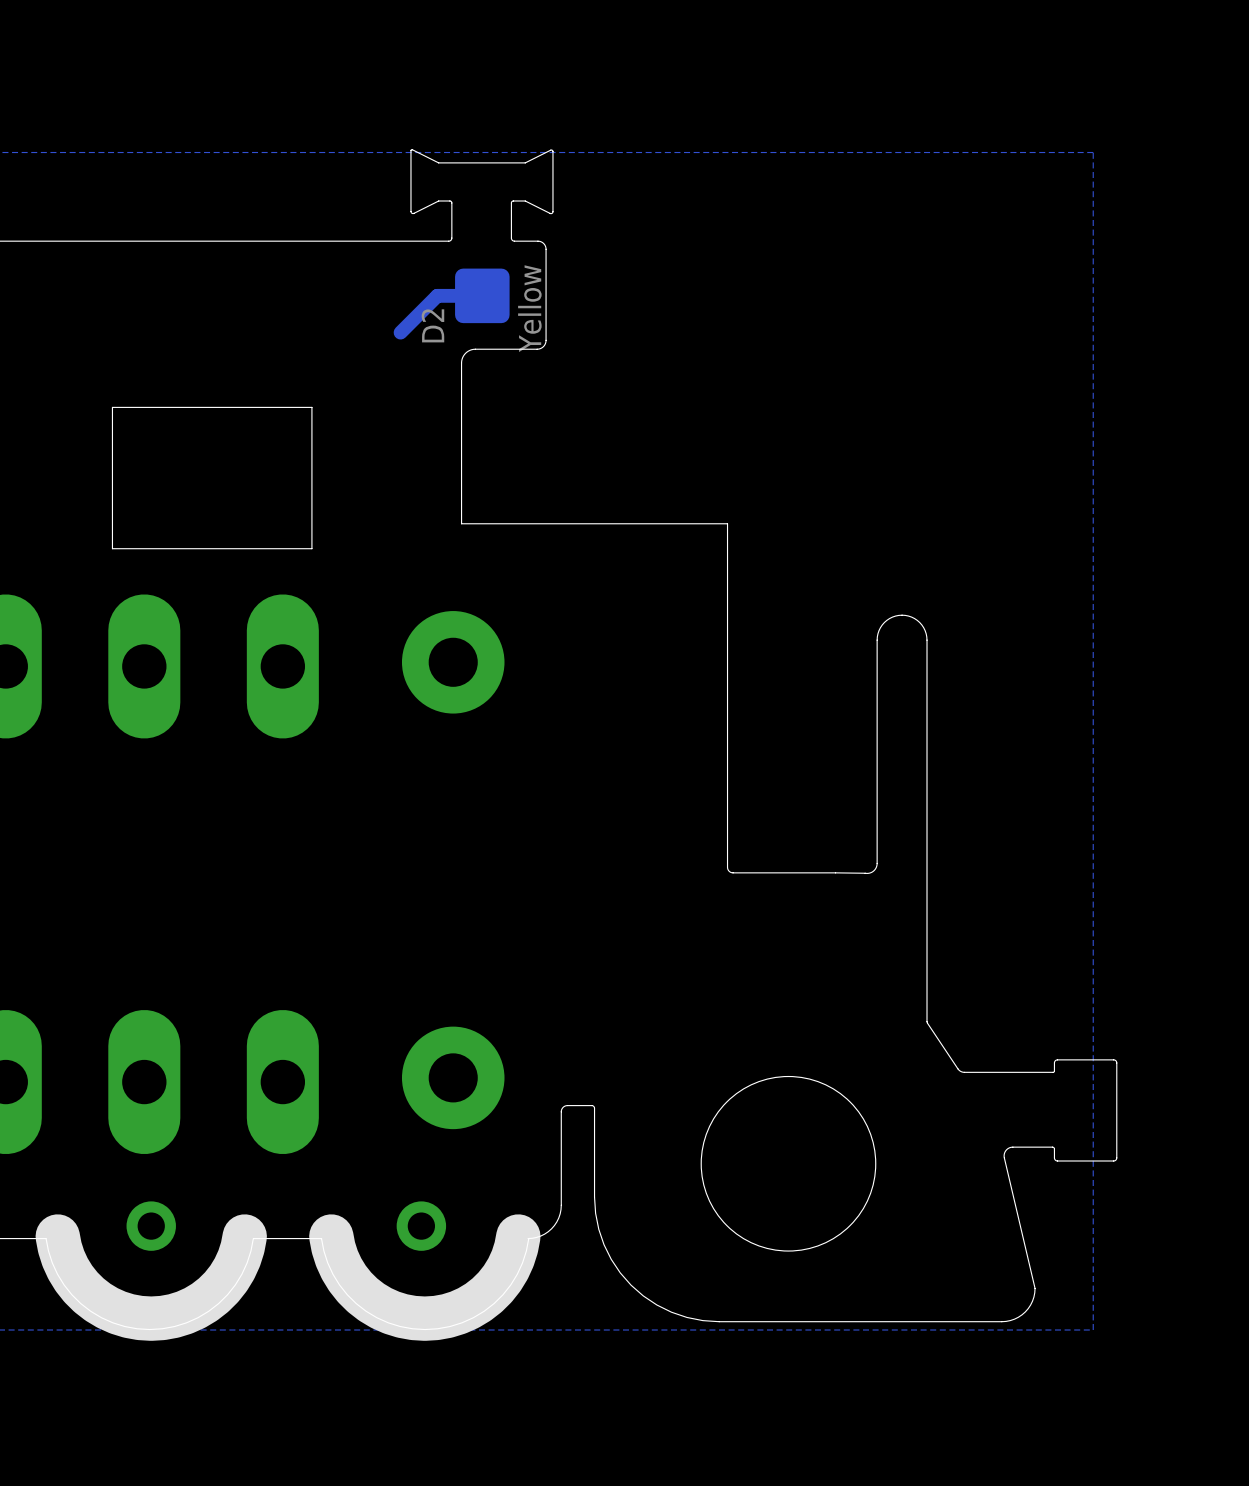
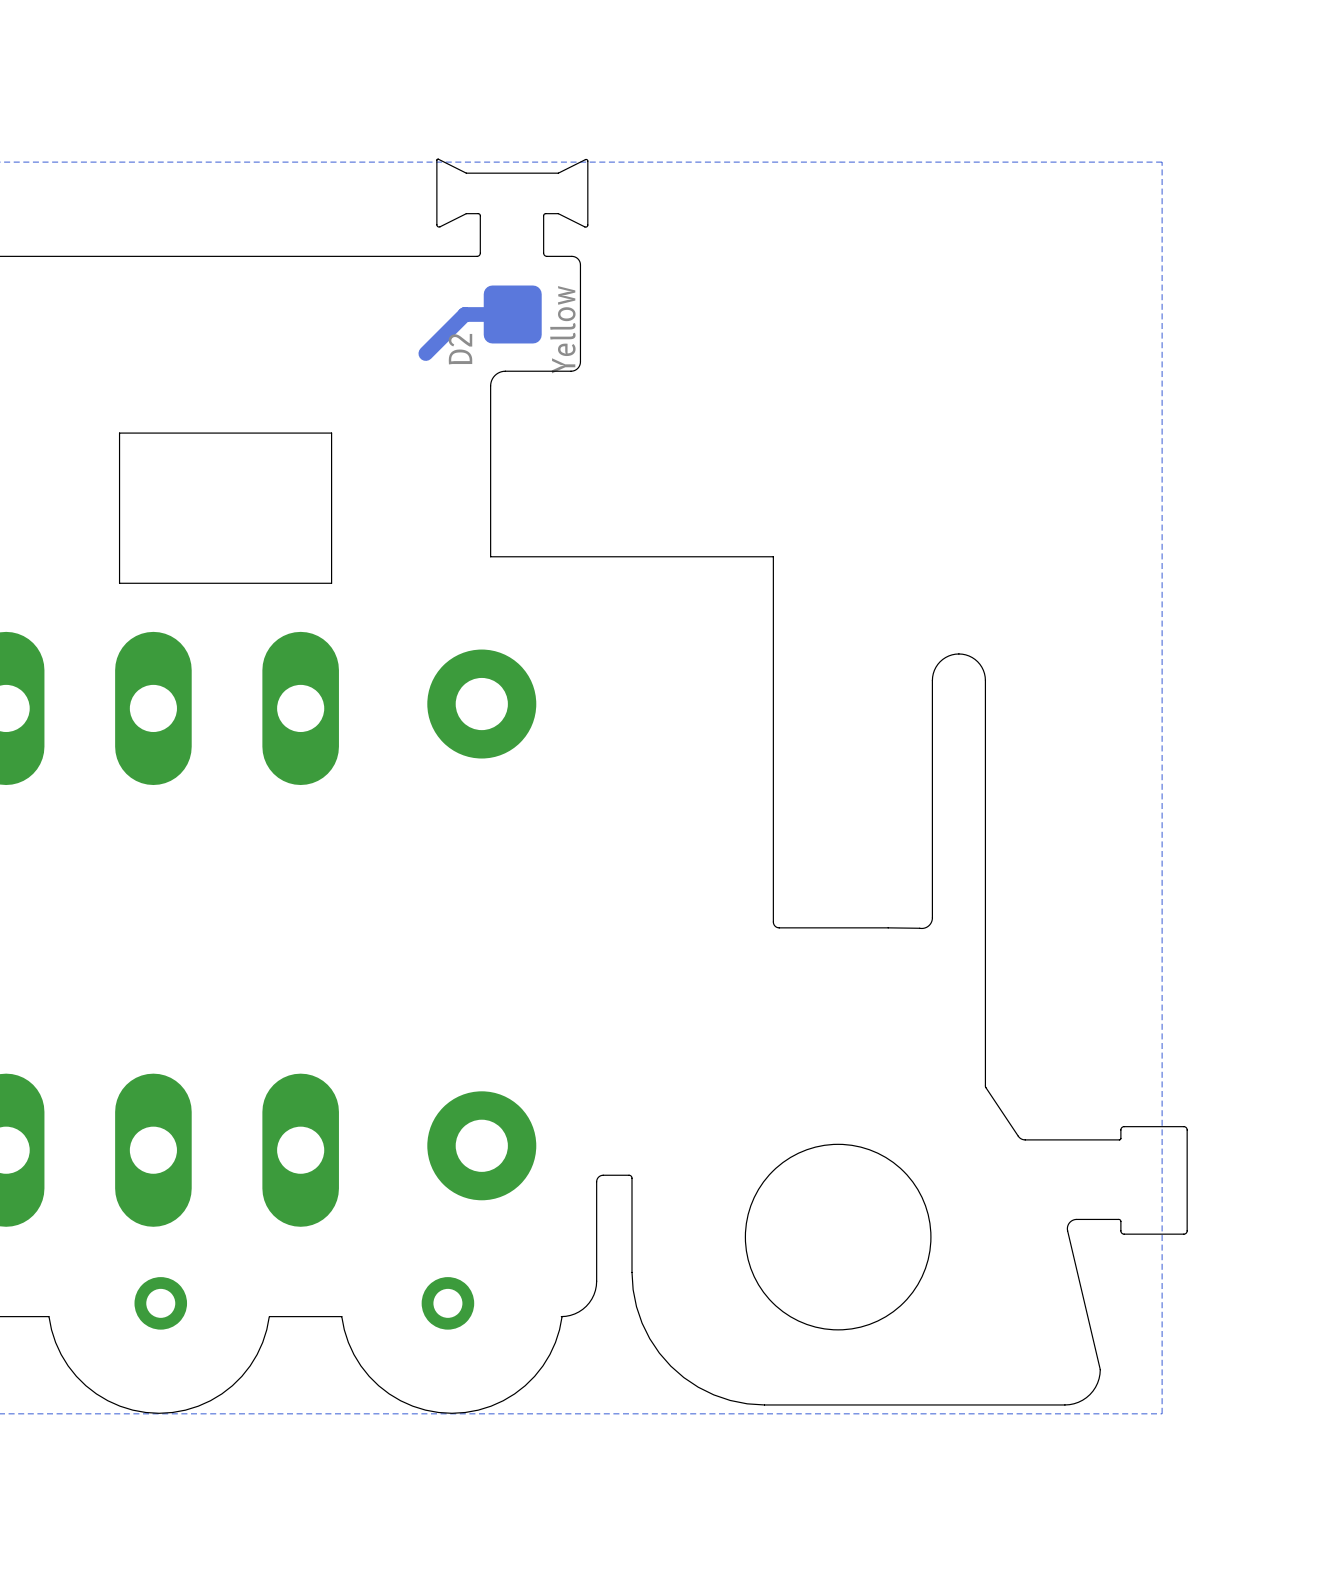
line: (244, 1236) (234, 1268) (213, 1295) (184, 1312) (151, 1318) (117, 1312) (89, 1295) (68, 1268) (57, 1236) -> none
line: (518, 1236) (508, 1268) (487, 1295) (458, 1312) (424, 1318) (391, 1312) (362, 1295) (341, 1268) (331, 1236) -> none

